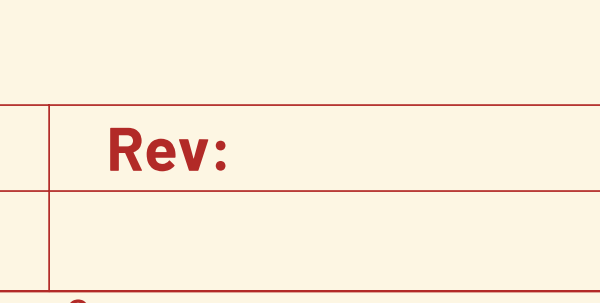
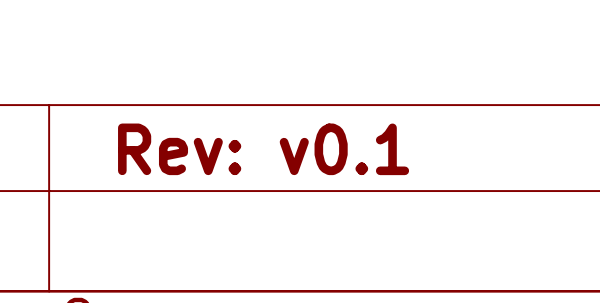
title block: Rev: (167, 149) -> Rev: v0.1 (263, 149)

